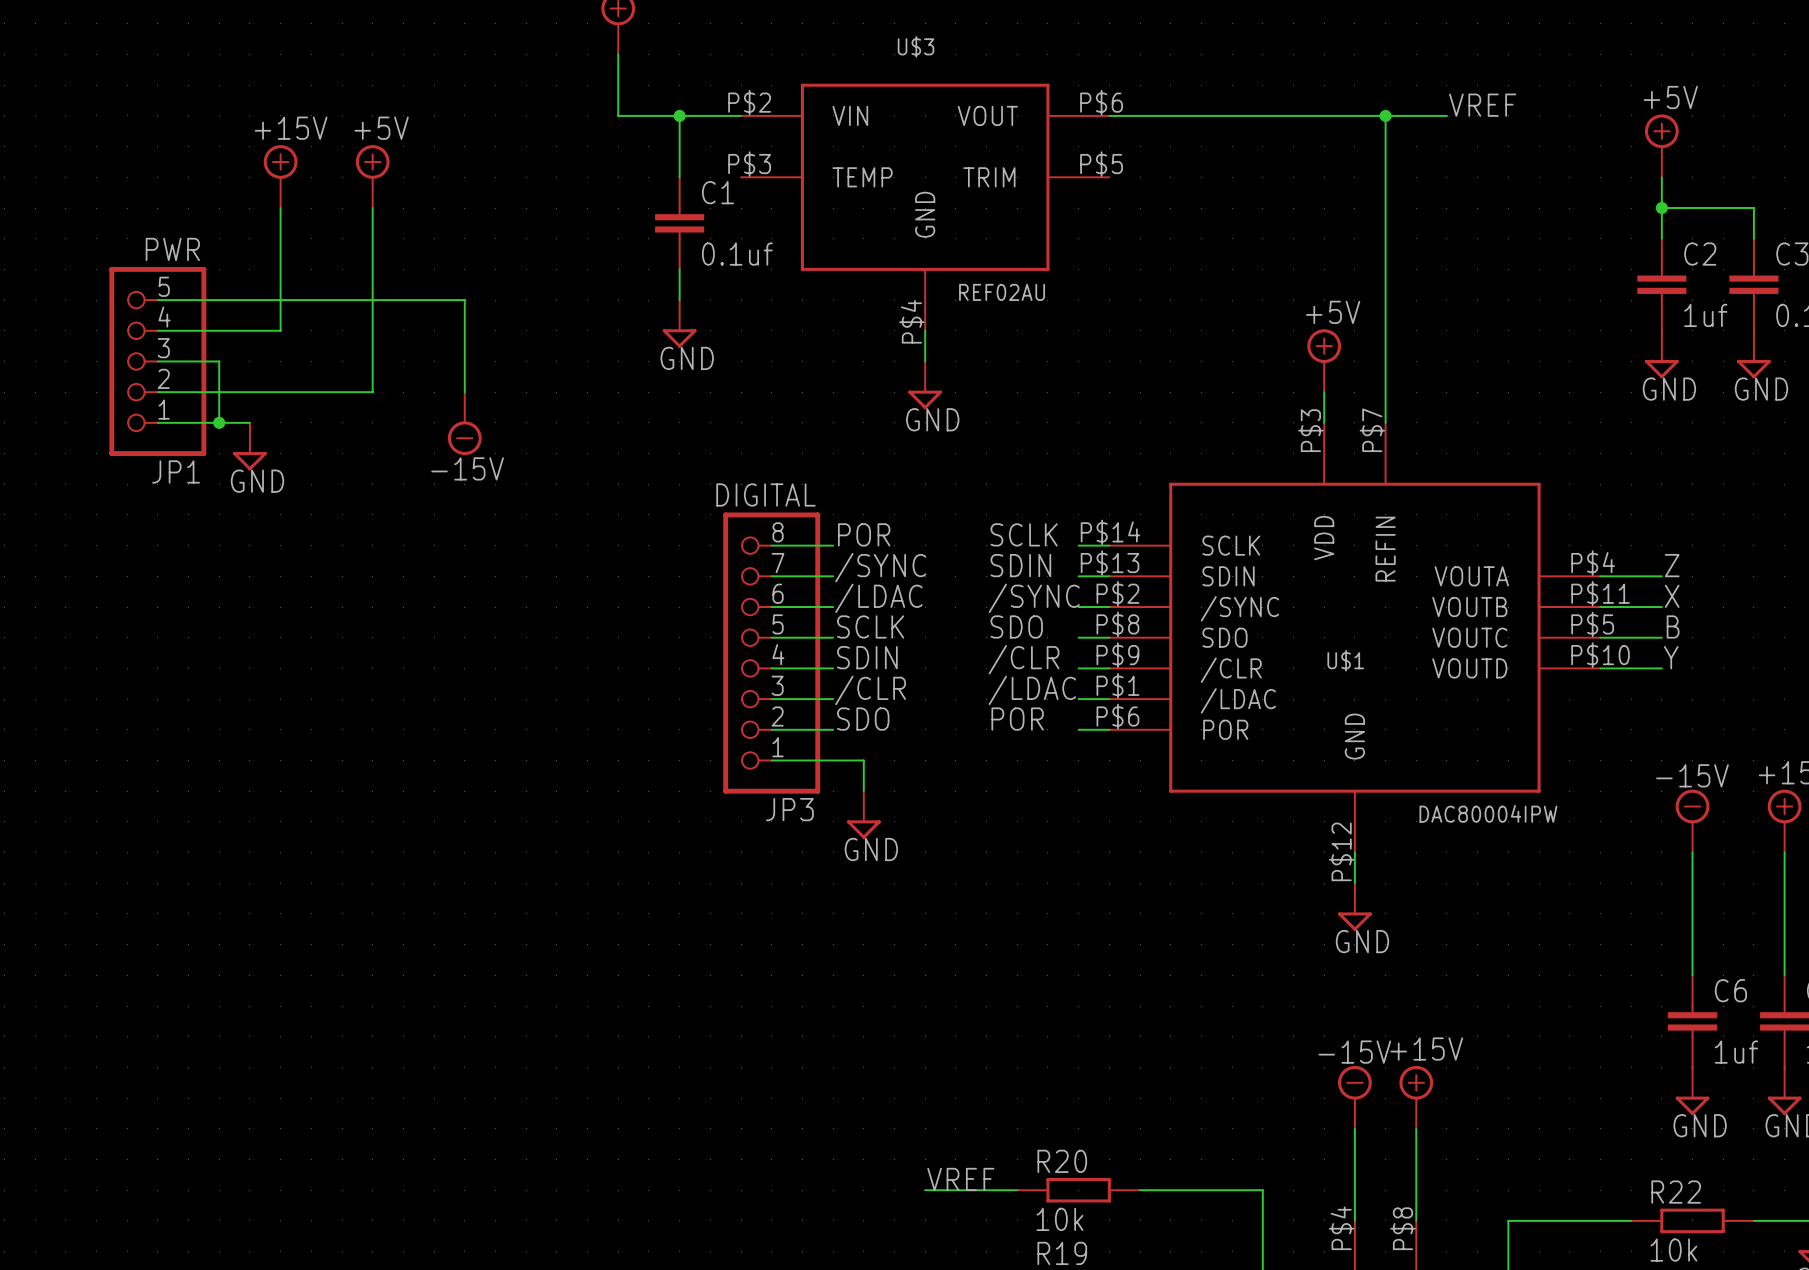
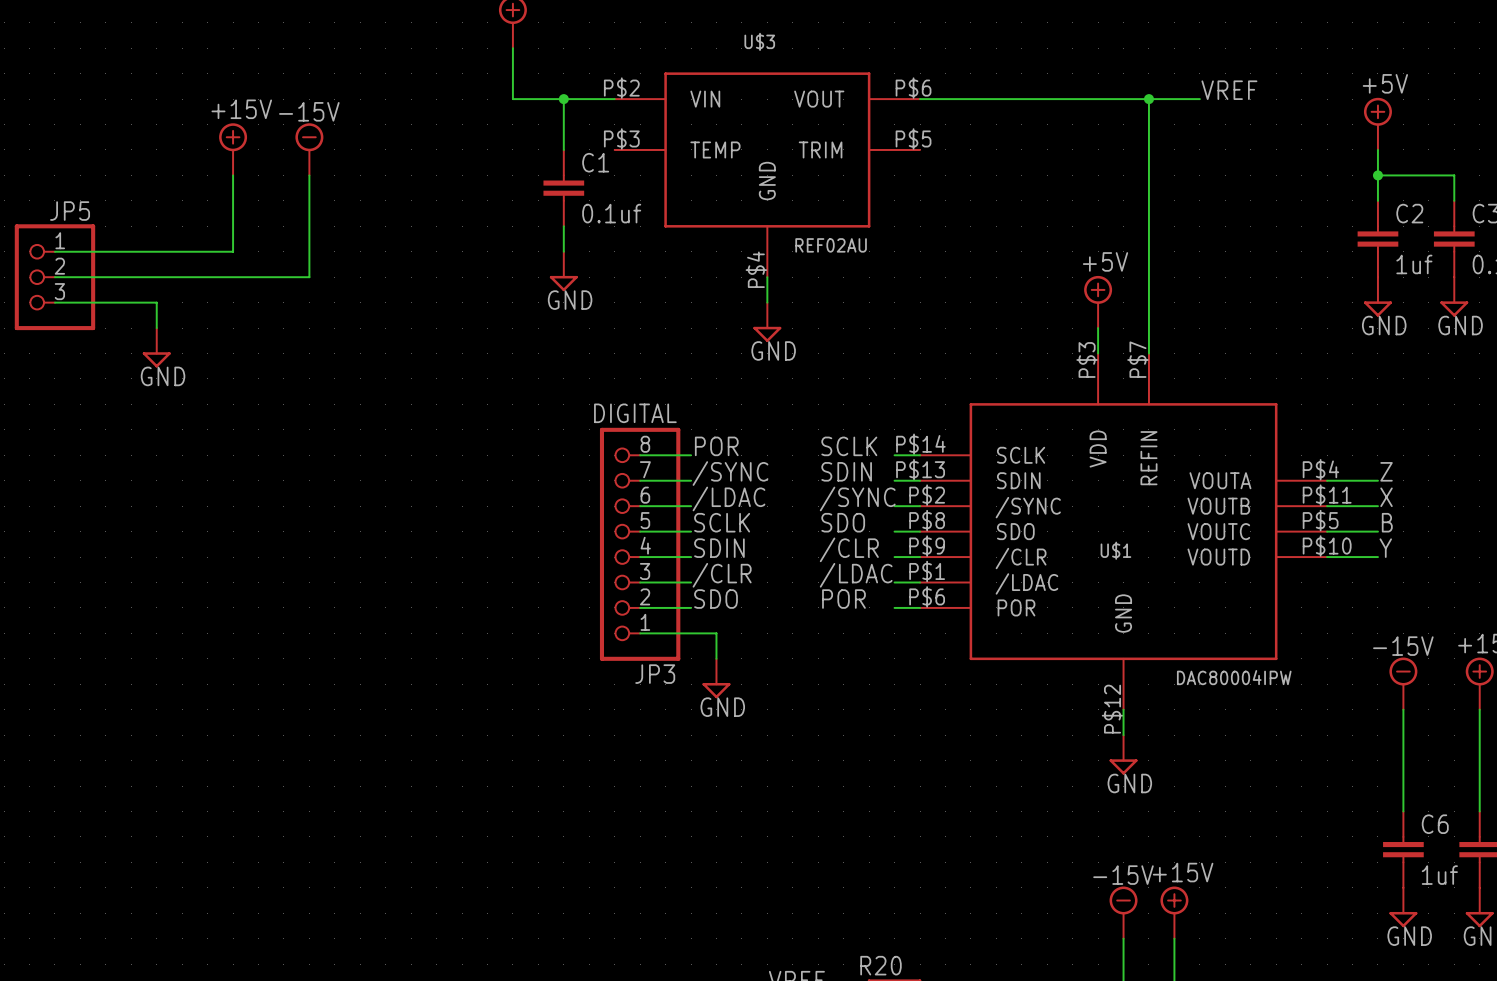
power symbol: +5V (372, 176) -> -15V (309, 149)
wire: none -> (54, 251) (131, 251)
wire: none -> (54, 277) (131, 277)
JP5: none -> (54, 277)
wire: (280, 330) (280, 300) (464, 300) (464, 392) -> (233, 277) (309, 277)
wire: (372, 330) (372, 392) (157, 392) -> none
JP1: PWR (157, 361) -> none
wire: (188, 361) (219, 361) (219, 422) -> (156, 302) (156, 328)
wire: (157, 422) (249, 422) -> (54, 302) (131, 302)
junction: (219, 422) -> none
power symbol: -15V (464, 423) -> none
power symbol position: GND (249, 446) -> GND (156, 347)

